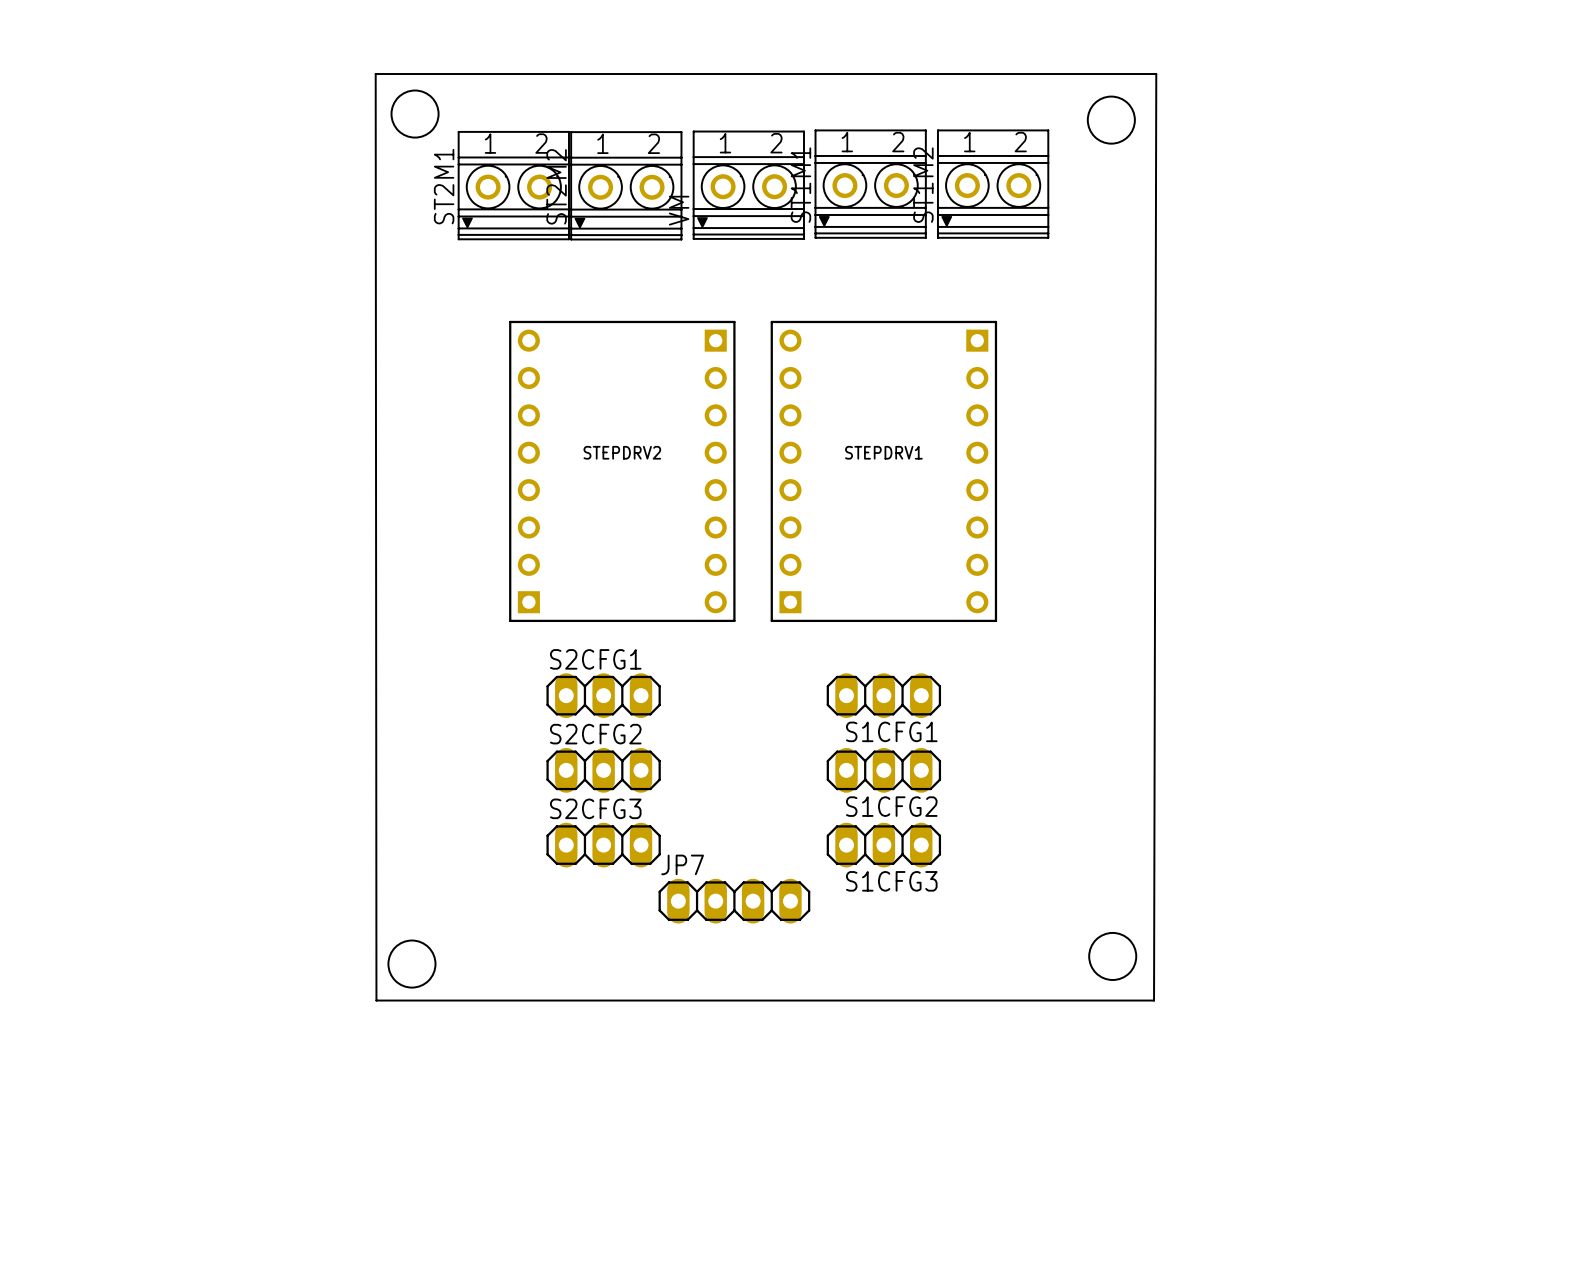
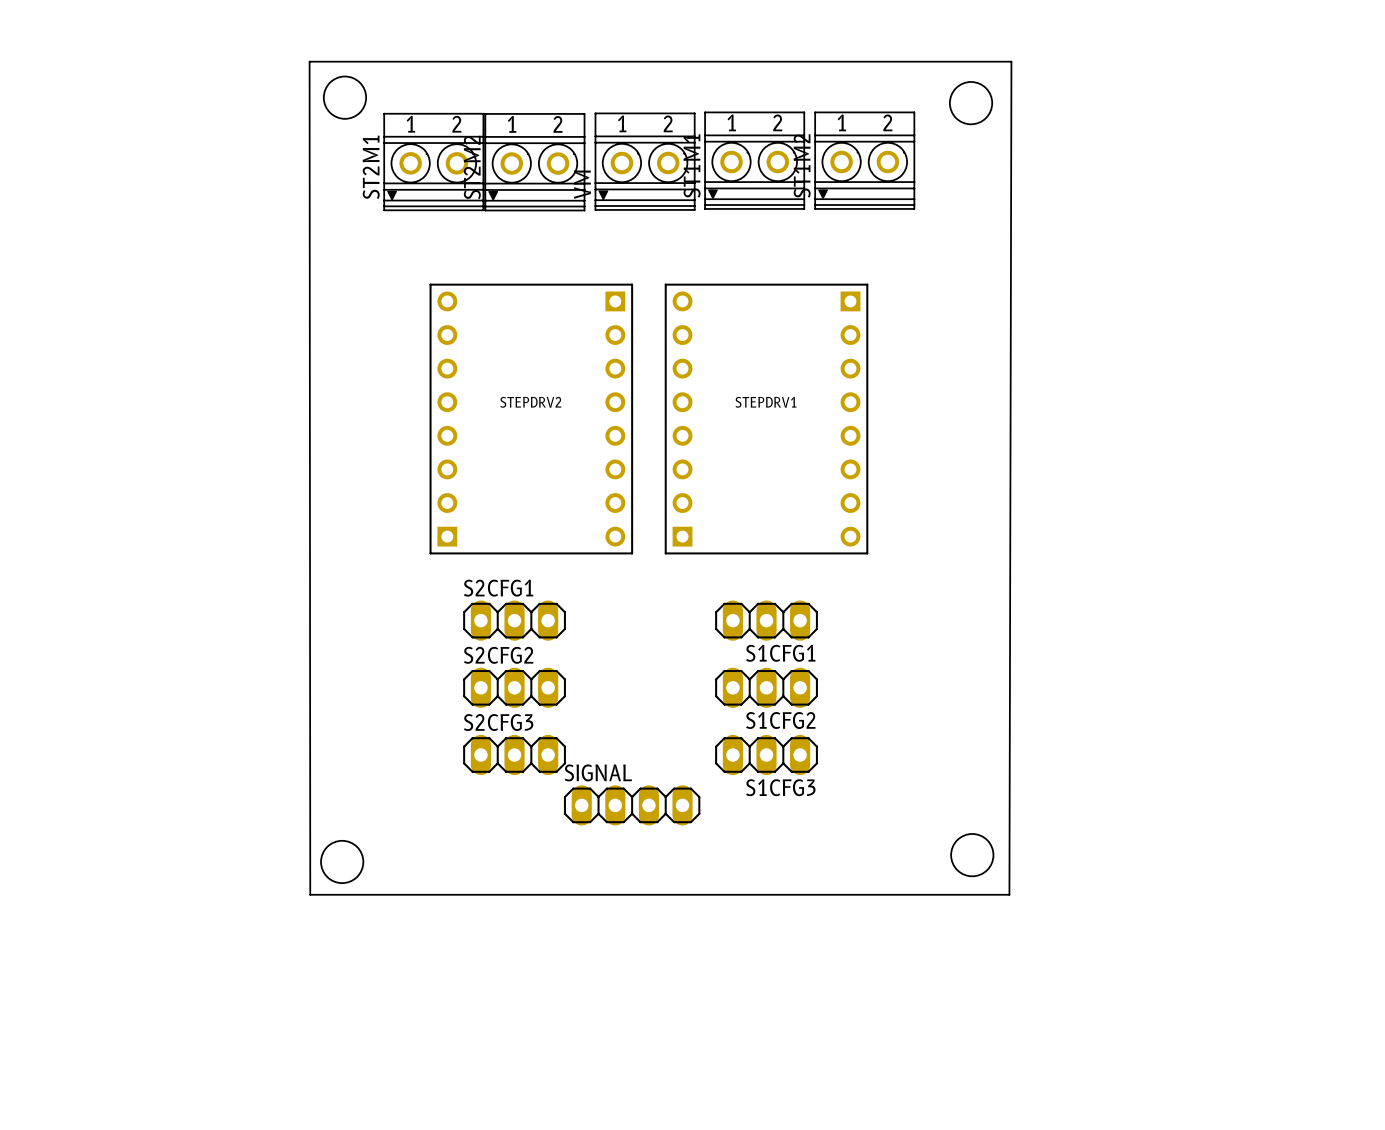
JP7 name: JP7 (682, 864) -> SIGNAL (598, 772)

